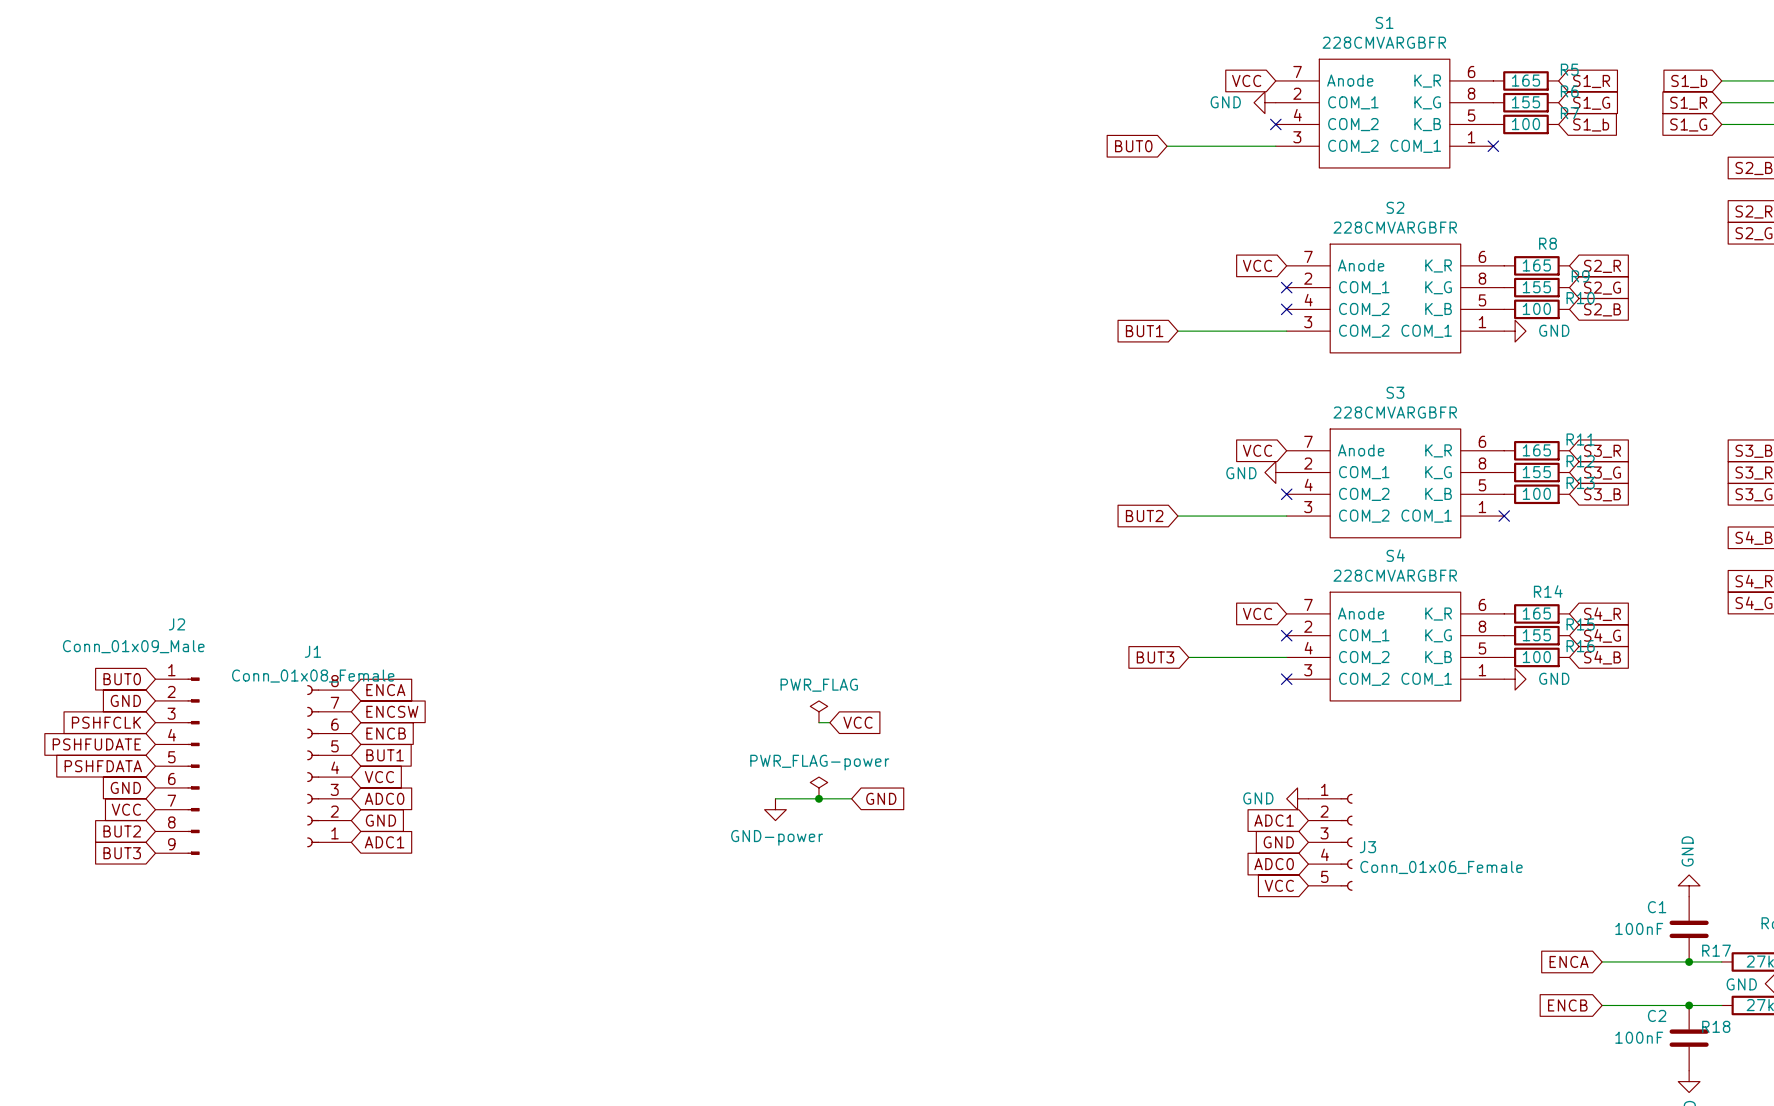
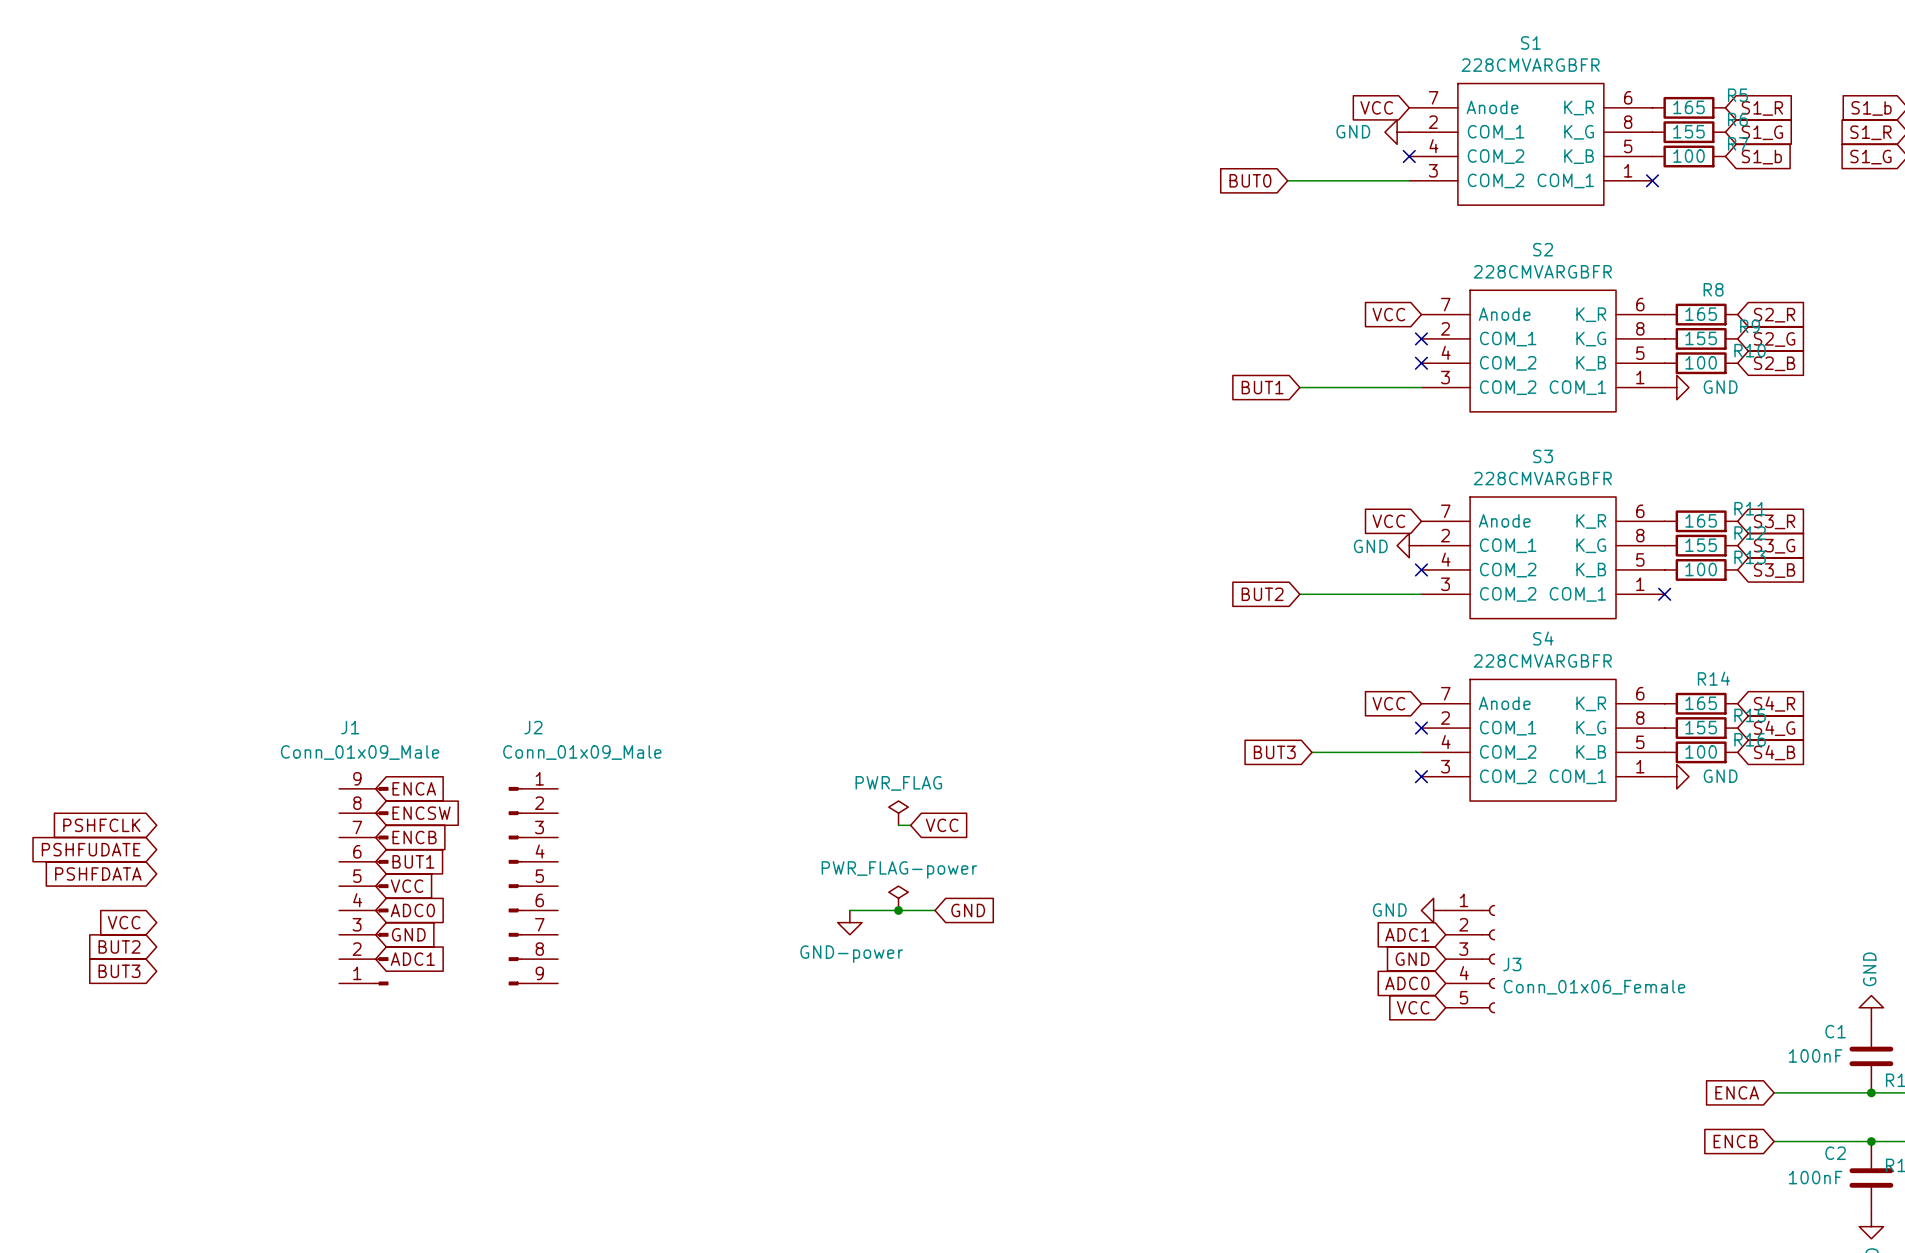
J1 name position: J1 (312, 651) -> J1 (350, 727)
J1 value: Conn_01x08_Female (313, 676) -> Conn_01x09_Male (360, 752)
global label: BUT0 (122, 679) -> none
J1 symbol: [307, 685, 352, 848] -> [339, 786, 389, 986]
global label: GND (125, 700) -> none
J2 position: (177, 766) -> (533, 886)
J2 flip: as is (193, 766) -> left-right (515, 886)
global label: GND (125, 787) -> none

